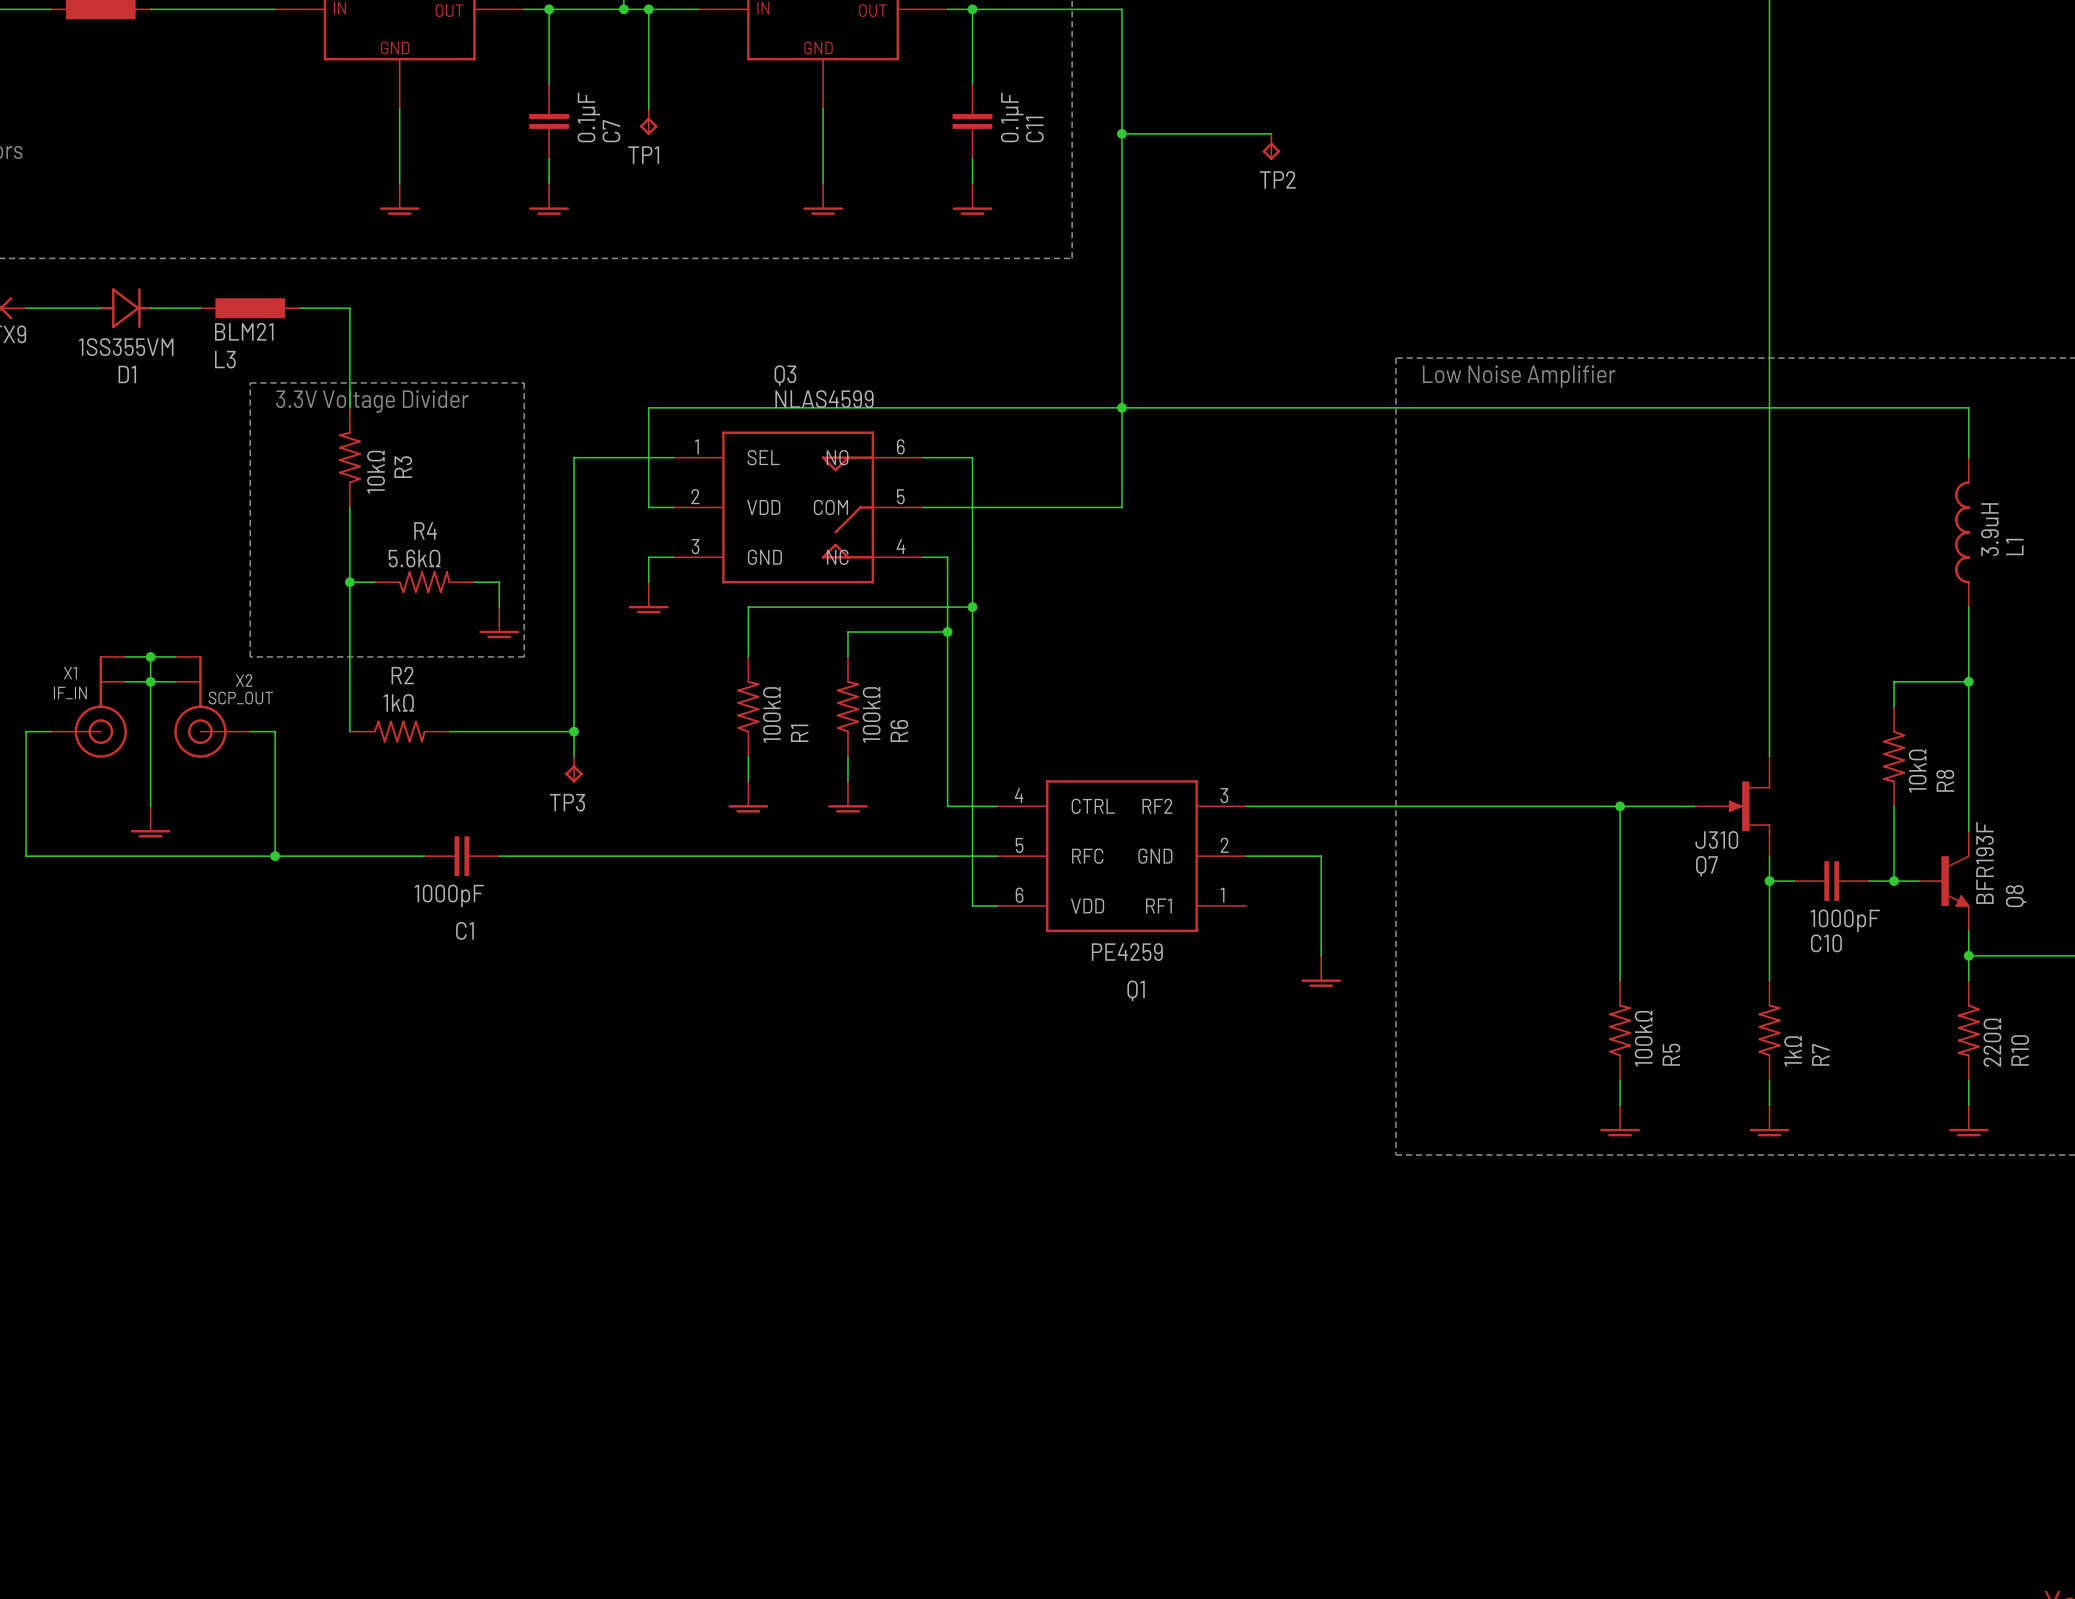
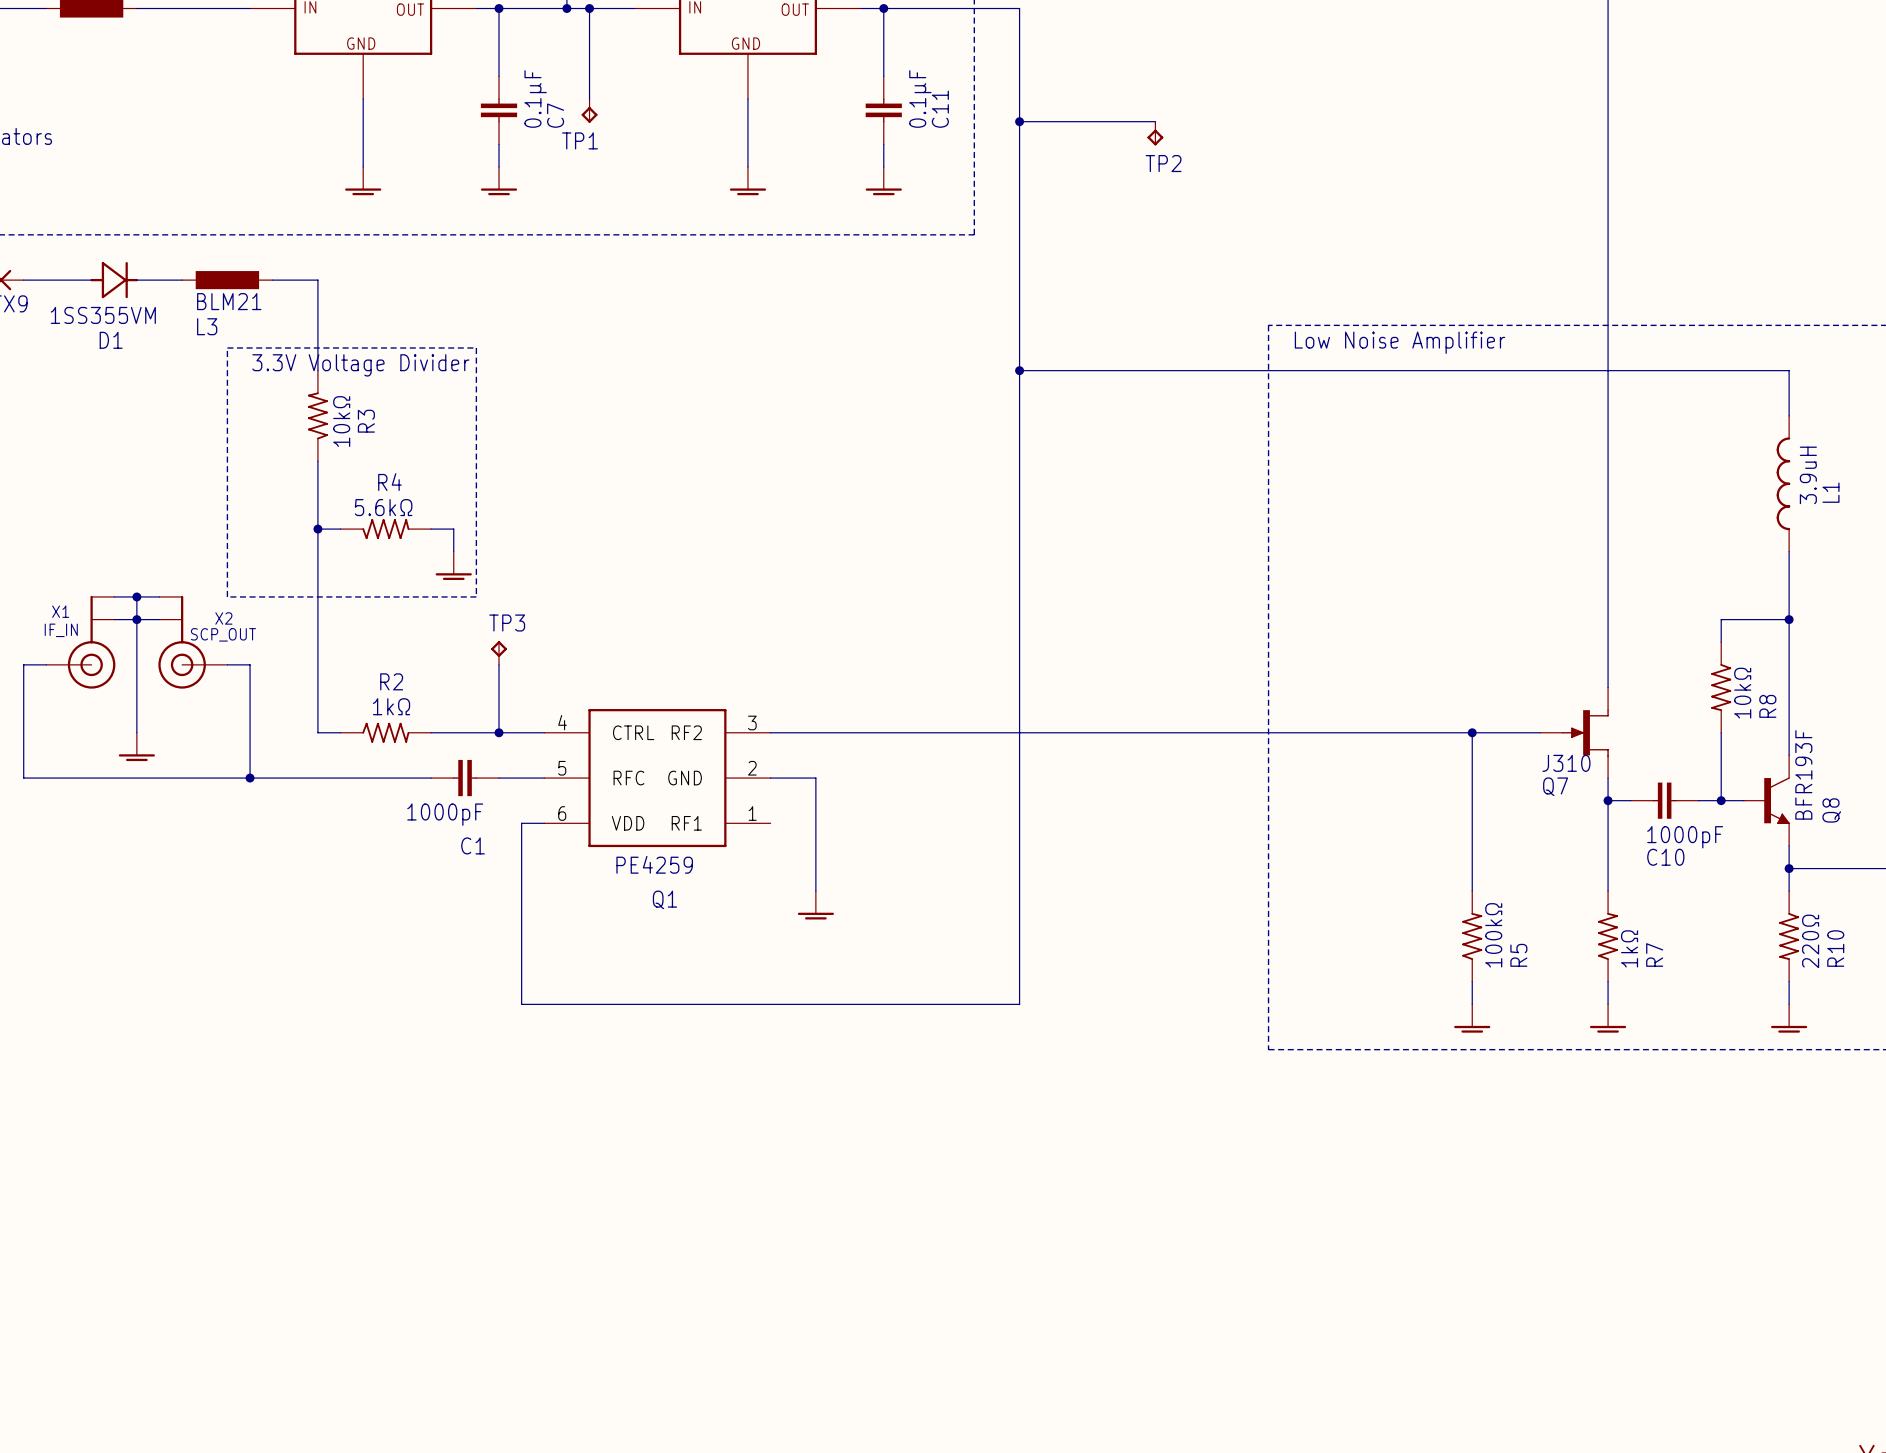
wire: (1121, 407) (648, 407) (648, 507) (673, 507) -> none
wire: (673, 457) (574, 457) (574, 756) -> none
wire: (922, 457) (972, 457) (972, 905) (997, 905) -> none
Q3: NLAS4599 (798, 507) -> none
wire: (922, 507) (1121, 507) -> (544, 823) (521, 823) (521, 1004) (1019, 1004) (1019, 461)
wire: (673, 557) (648, 557) (648, 582) -> none
wire: (922, 557) (947, 557) (947, 806) -> (770, 732) (861, 732)
power symbol: (648, 597) -> none
wire: (972, 607) (748, 607) (748, 656) -> none
junction: (972, 607) -> none
wire: (947, 632) (847, 632) (847, 656) -> none
junction: (947, 632) -> none
R1: 100kΩ (748, 706) -> none
R6: 100kΩ (847, 706) -> none
wire: none -> (317, 664) (317, 732) (340, 732)
R2 position: (399, 731) -> (385, 732)
wire: (449, 731) (574, 731) -> (431, 732) (544, 732)
wire: none -> (499, 664) (499, 732)
junction: (574, 731) -> none
wire: (748, 756) (748, 781) -> none
wire: (847, 756) (847, 781) -> none
TP3 position: (574, 769) -> (499, 652)
TP3 rotation: 0° (574, 773) -> 180° (499, 649)
power symbol: (748, 797) -> none
power symbol: (847, 797) -> none
junction: none -> (499, 732)
wire: none -> (906, 732) (1132, 732)
C1 position: (461, 856) -> (465, 778)
wire: (598, 856) (847, 856) -> none
wire: (897, 856) (997, 856) -> (815, 778) (815, 891)
Q1 position: (1121, 856) -> (657, 778)
wire: (1246, 856) (1321, 856) (1321, 955) -> none
power symbol: (1321, 971) -> none
power symbol: none -> (815, 905)

